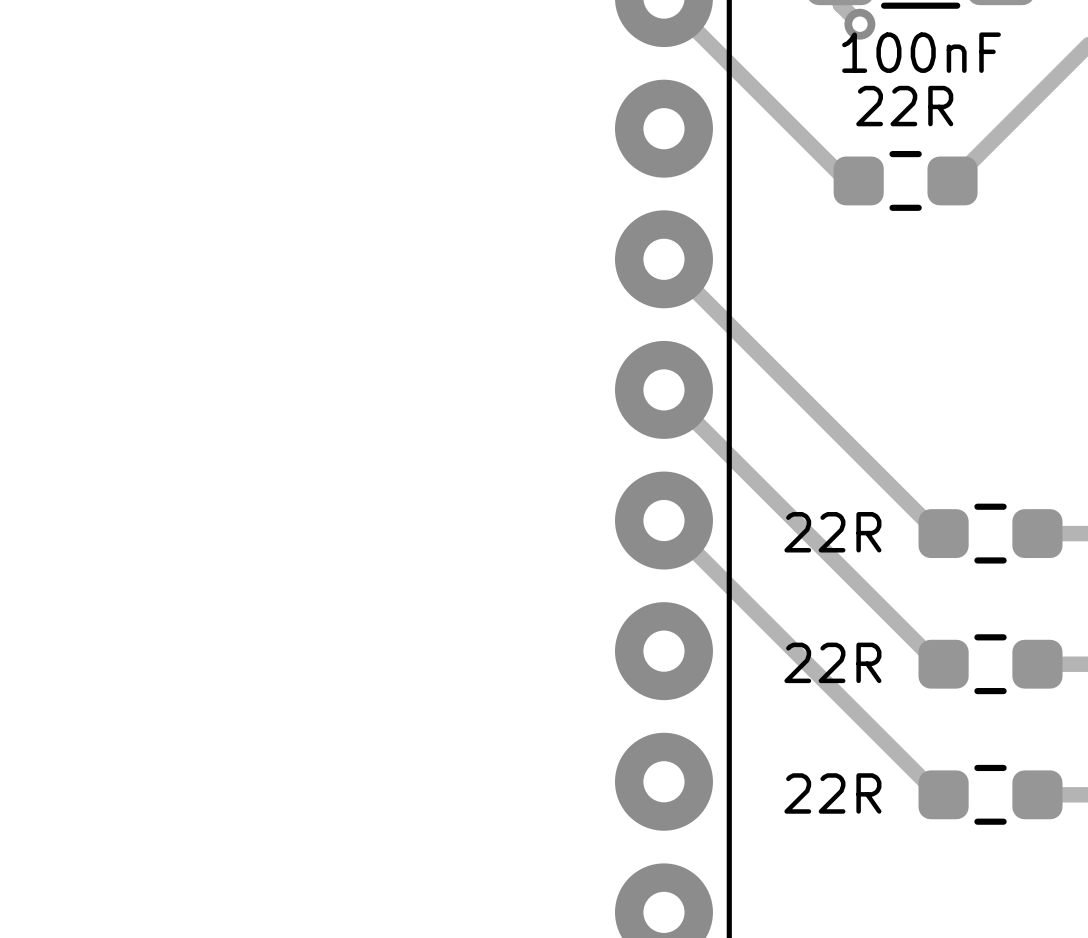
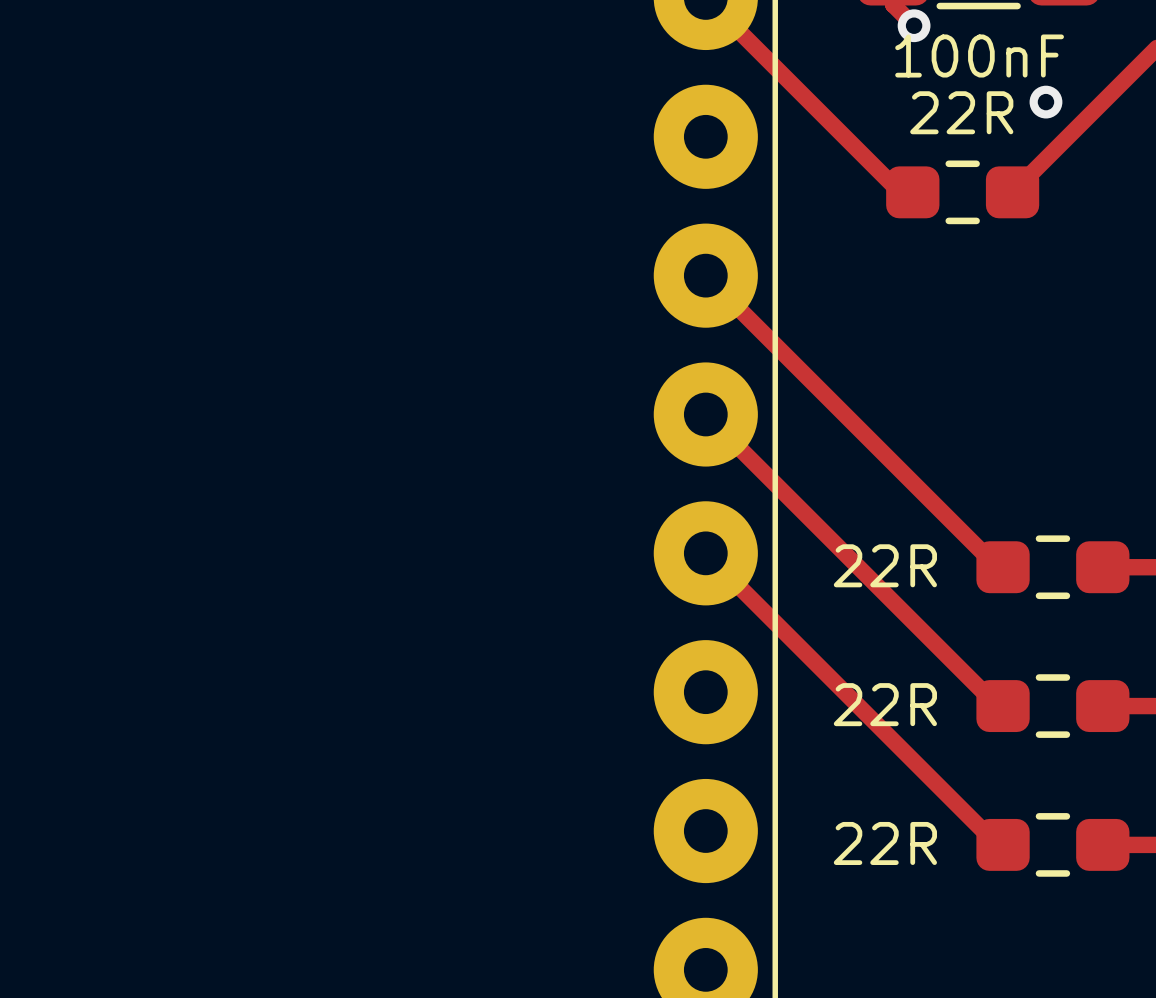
via: none -> (1045, 102)

